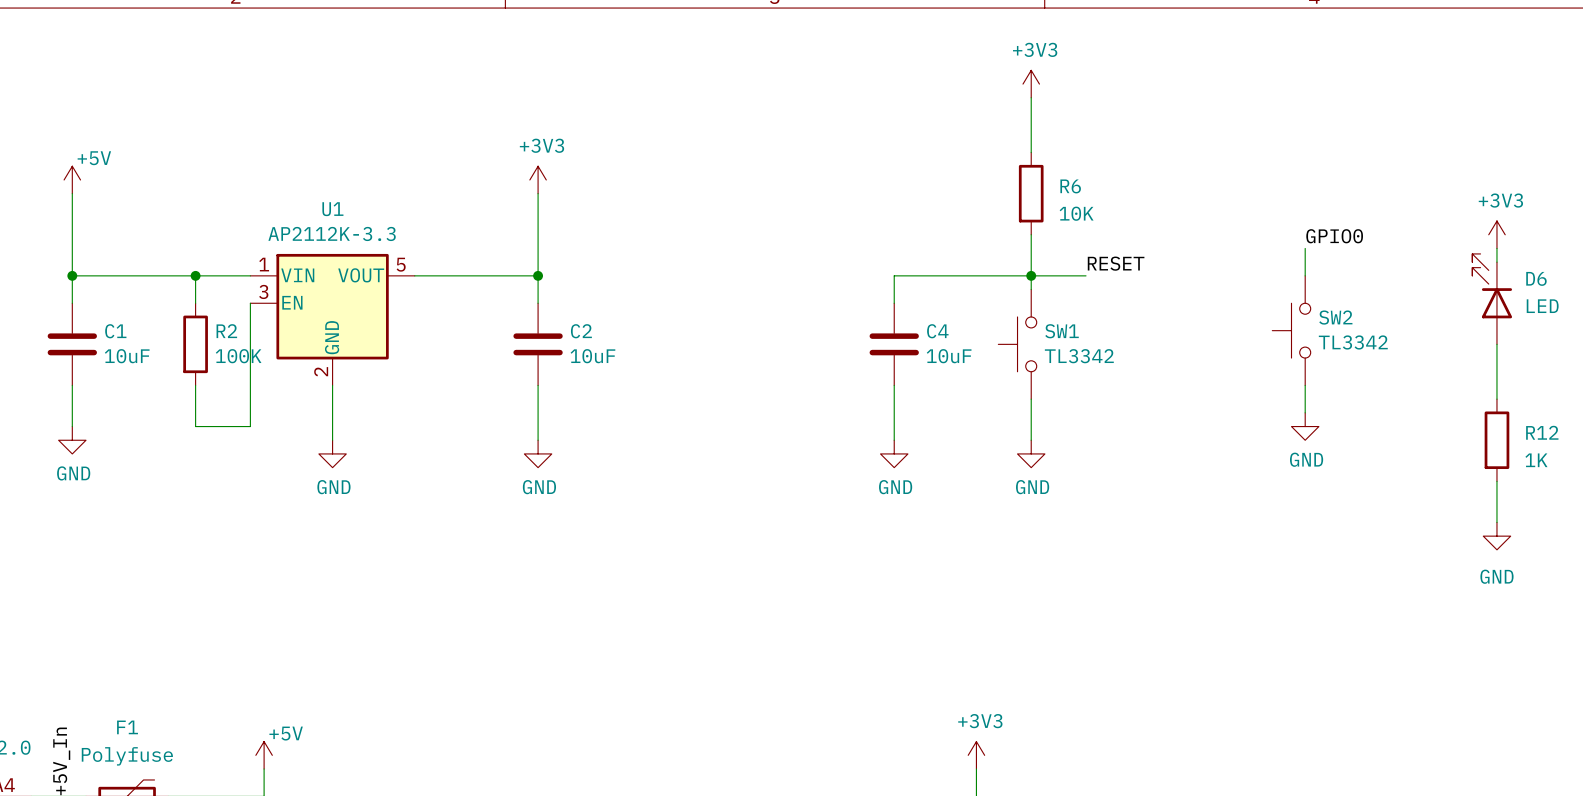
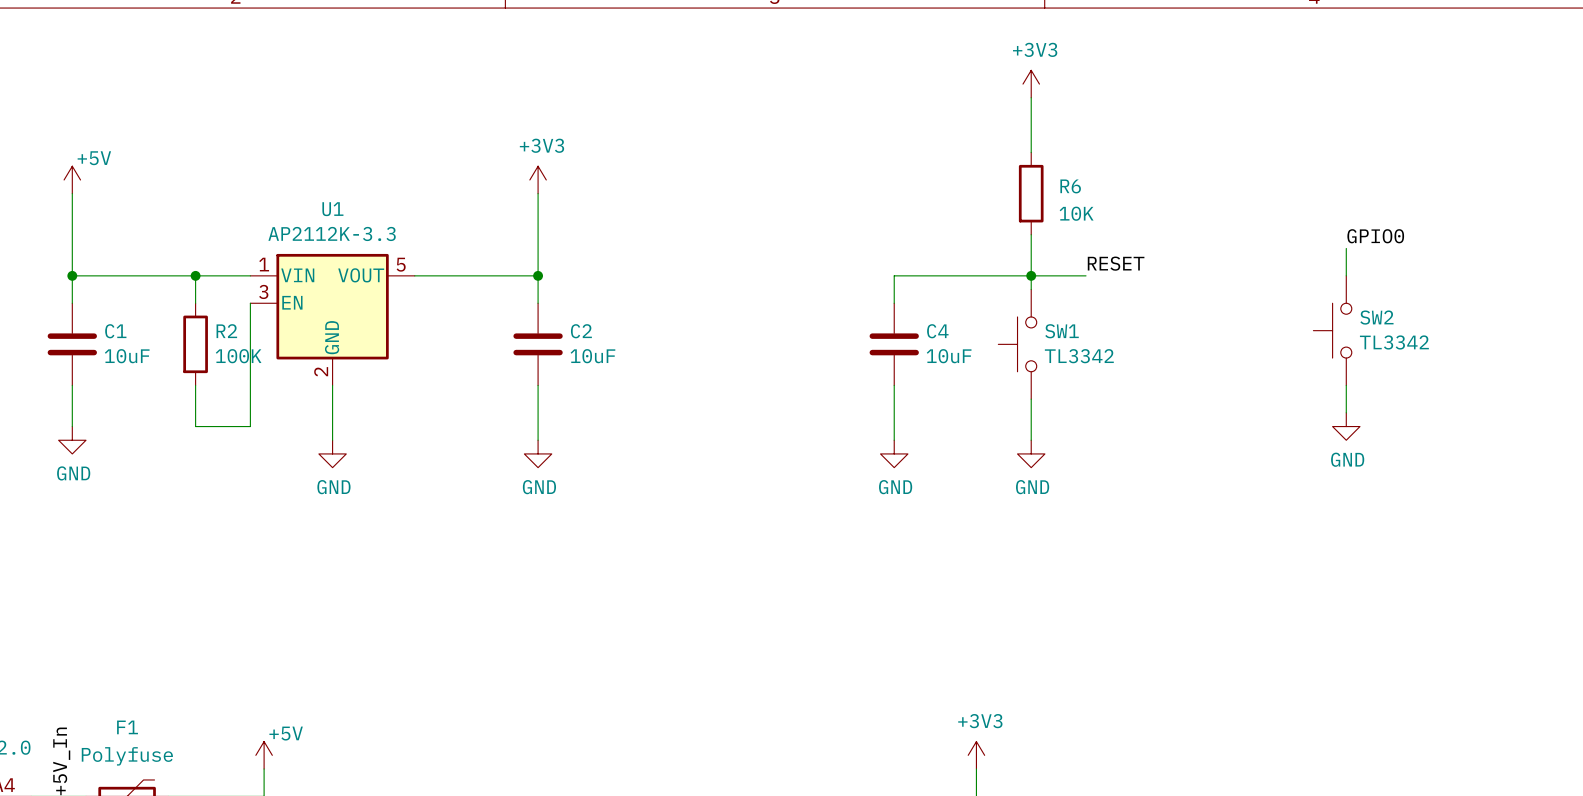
power symbol: +3V3 (1496, 234) -> none
label position: GPIO0 (1334, 236) -> GPIO0 (1375, 236)
wire: (1305, 248) (1305, 275) -> (1346, 248) (1346, 275)
wire: (1496, 248) (1496, 262) -> none
D6: LED (1492, 299) -> none
SW2 position: (1291, 330) -> (1332, 330)
wire: (1496, 344) (1496, 399) -> none
wire: (1305, 385) (1305, 412) -> (1346, 385) (1346, 412)
power symbol position: GND (1305, 426) -> GND (1346, 426)
R12: 1K (1496, 440) -> none
wire: (1496, 481) (1496, 522) -> none
power symbol: GND (1496, 536) -> none

